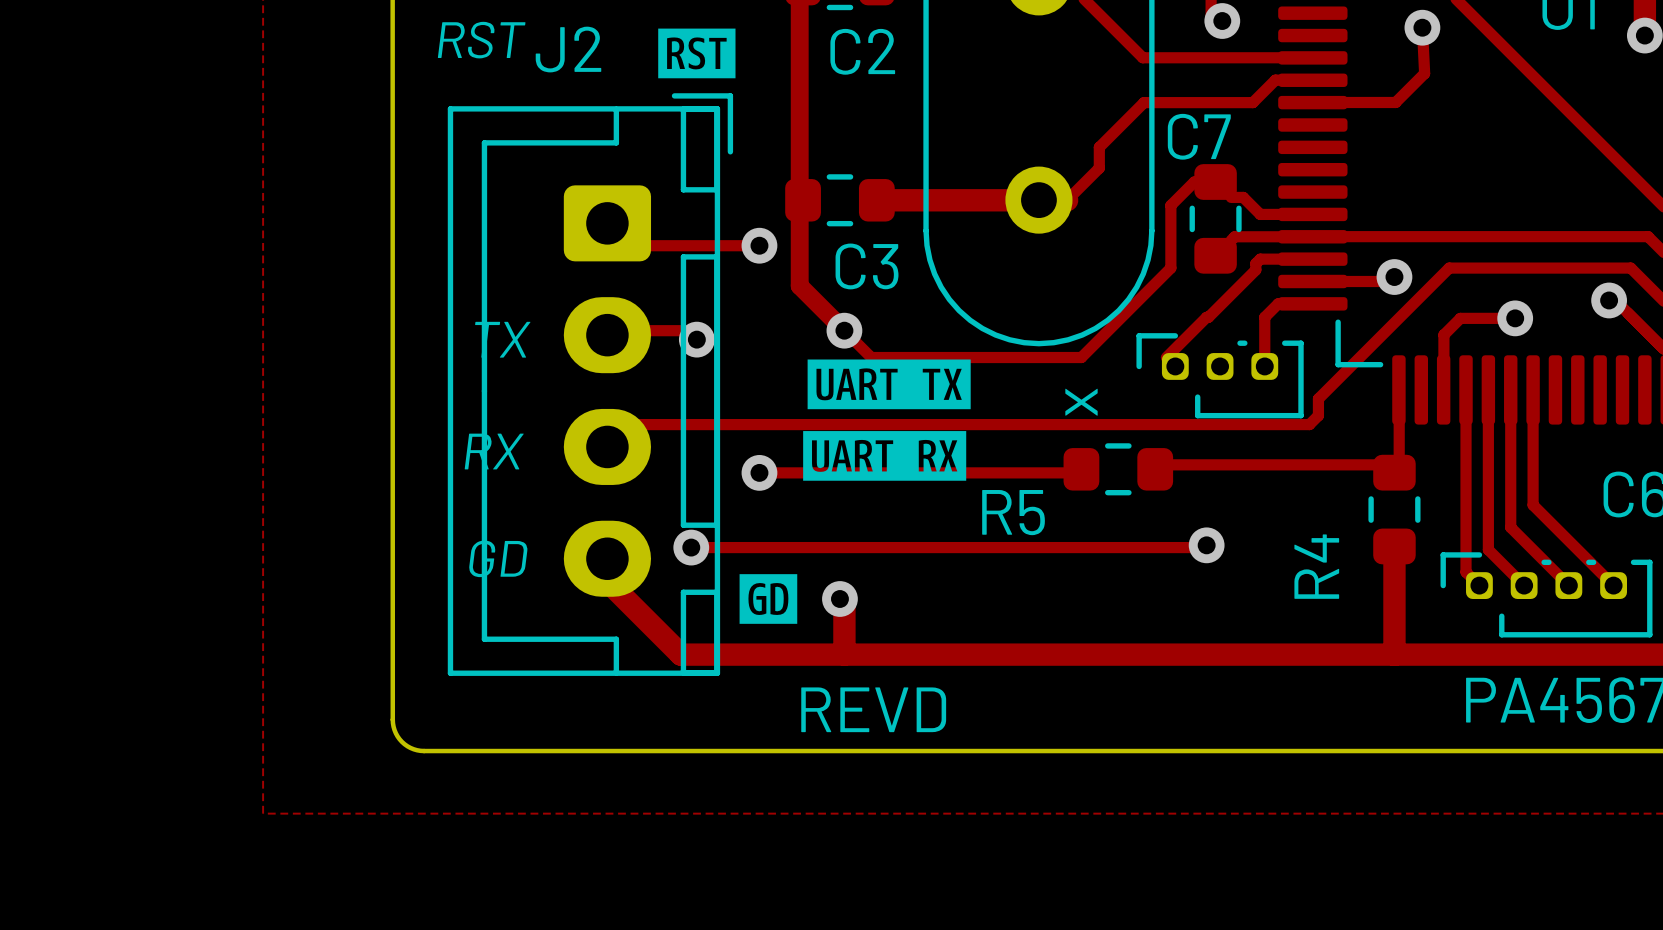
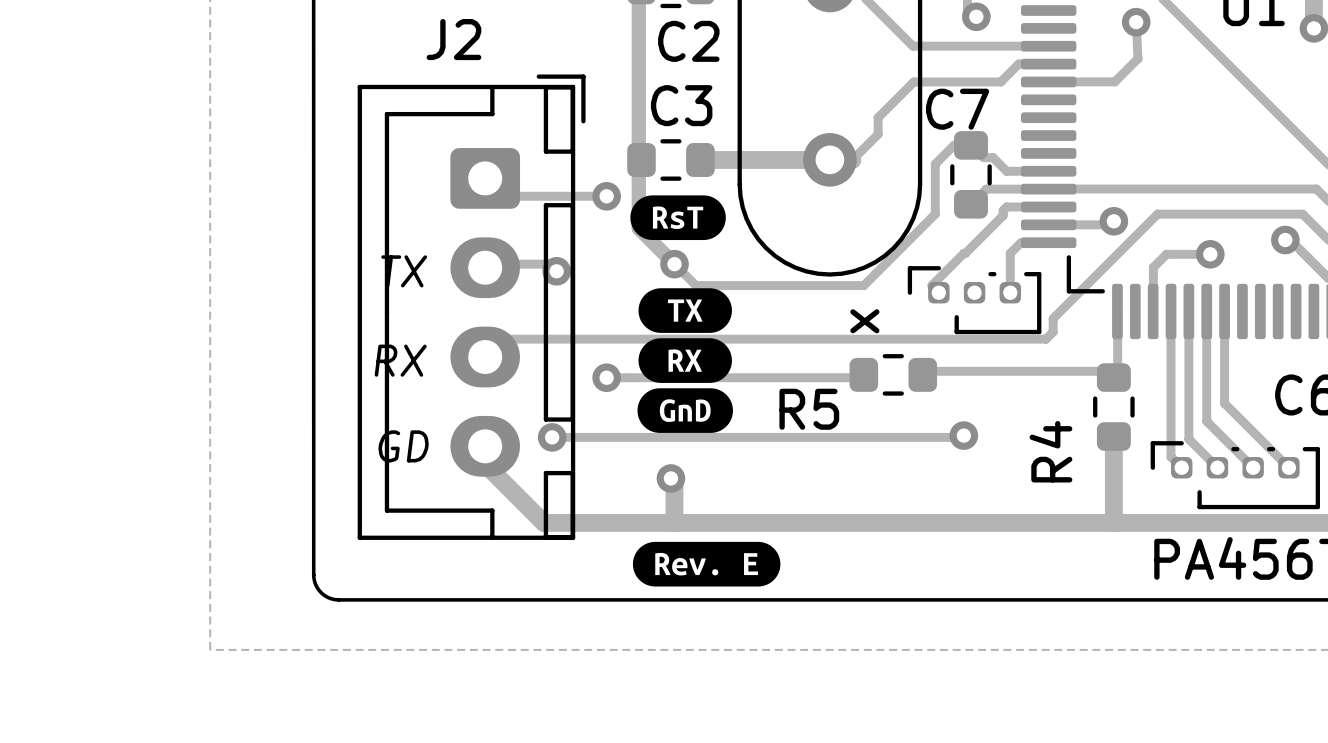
drawing: [658, 28, 736, 79] -> none
text: RST (481, 40) -> none
drawing: none -> [630, 195, 726, 241]
C3 name position: C3 (867, 266) -> C3 (681, 105)
drawing shape: [807, 359, 971, 410] -> [638, 288, 732, 333]
drawing shape: [803, 431, 967, 481] -> [638, 338, 732, 383]
drawing: none -> [637, 388, 733, 433]
drawing: [739, 574, 798, 624] -> none
drawing: none -> [632, 541, 781, 587]
text: REVD (873, 709) -> none

